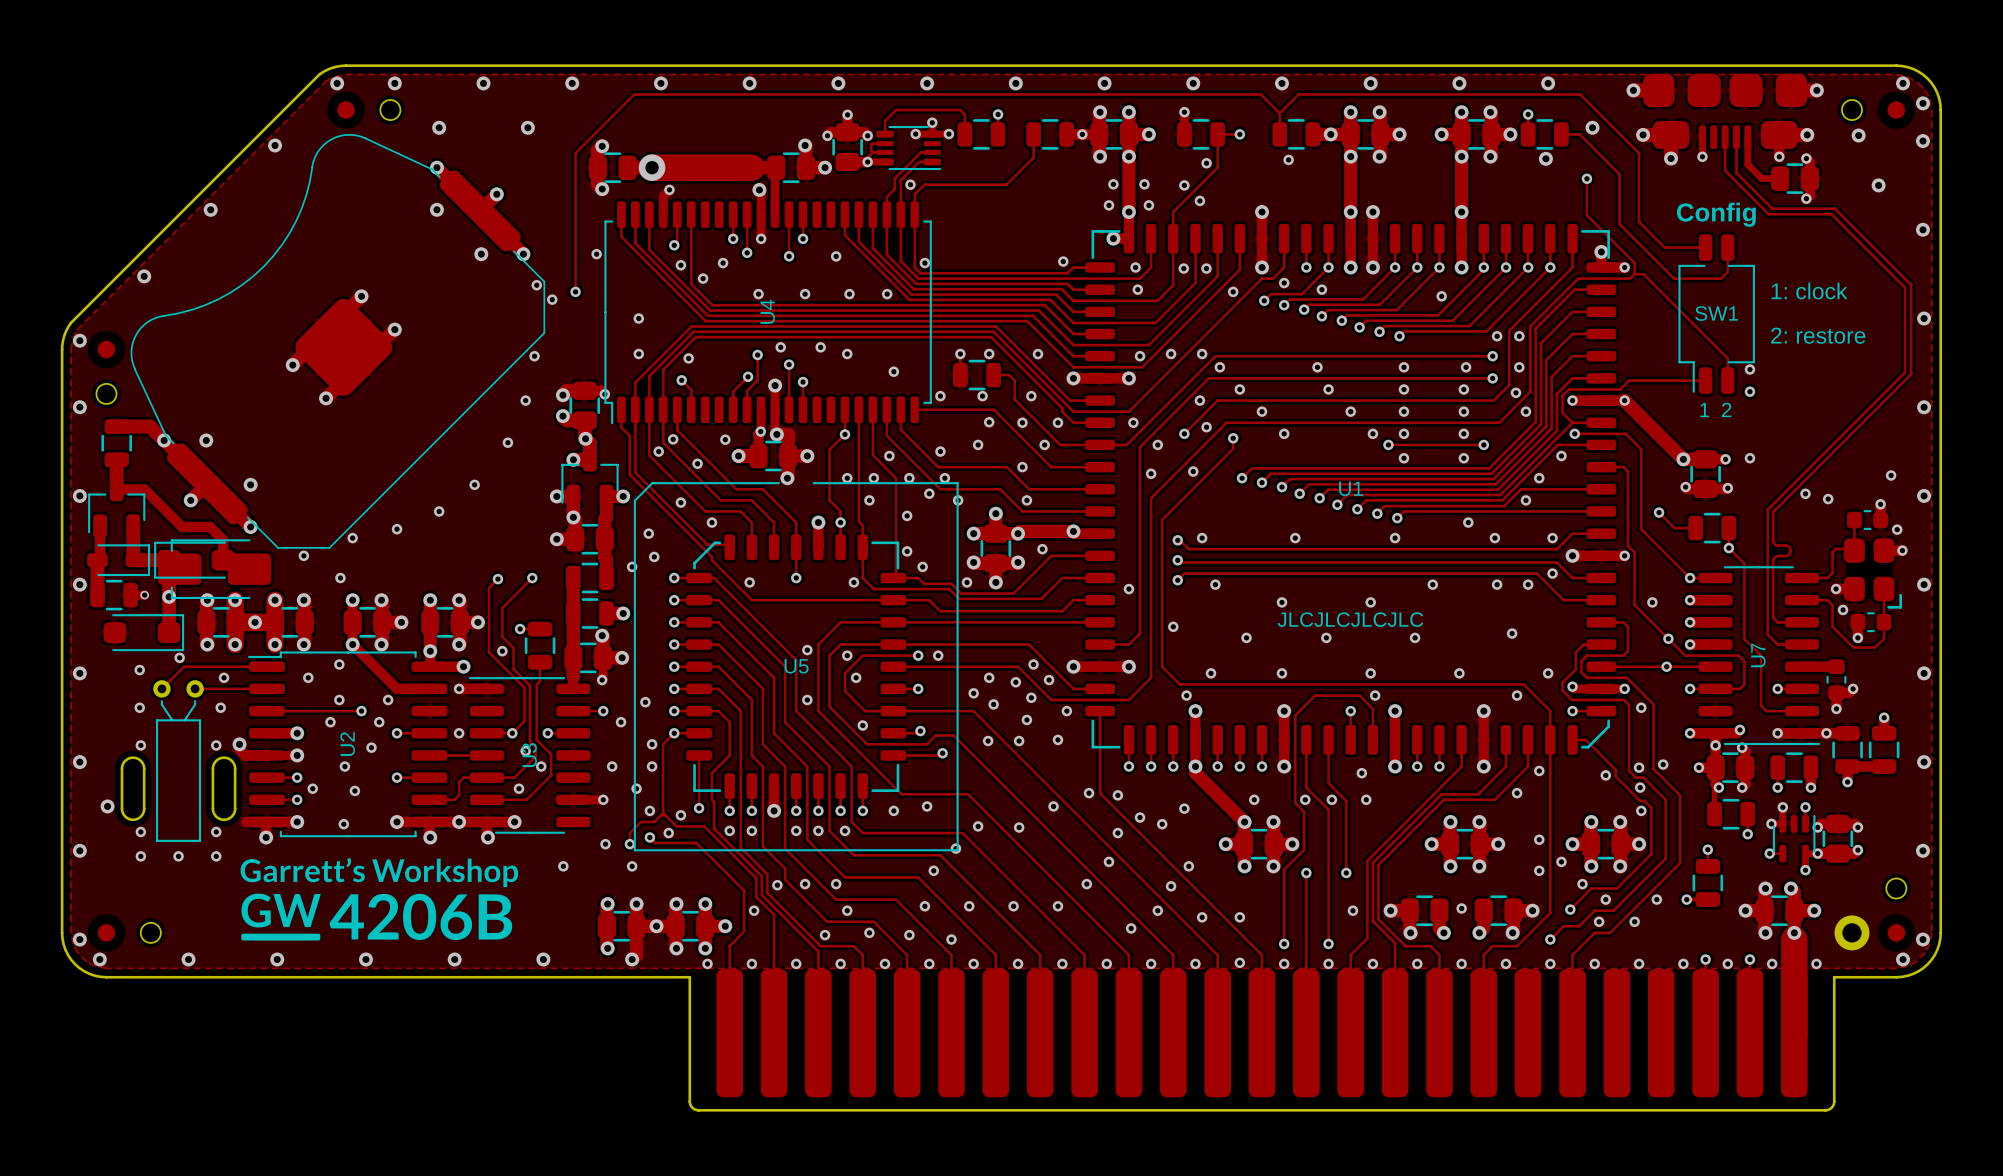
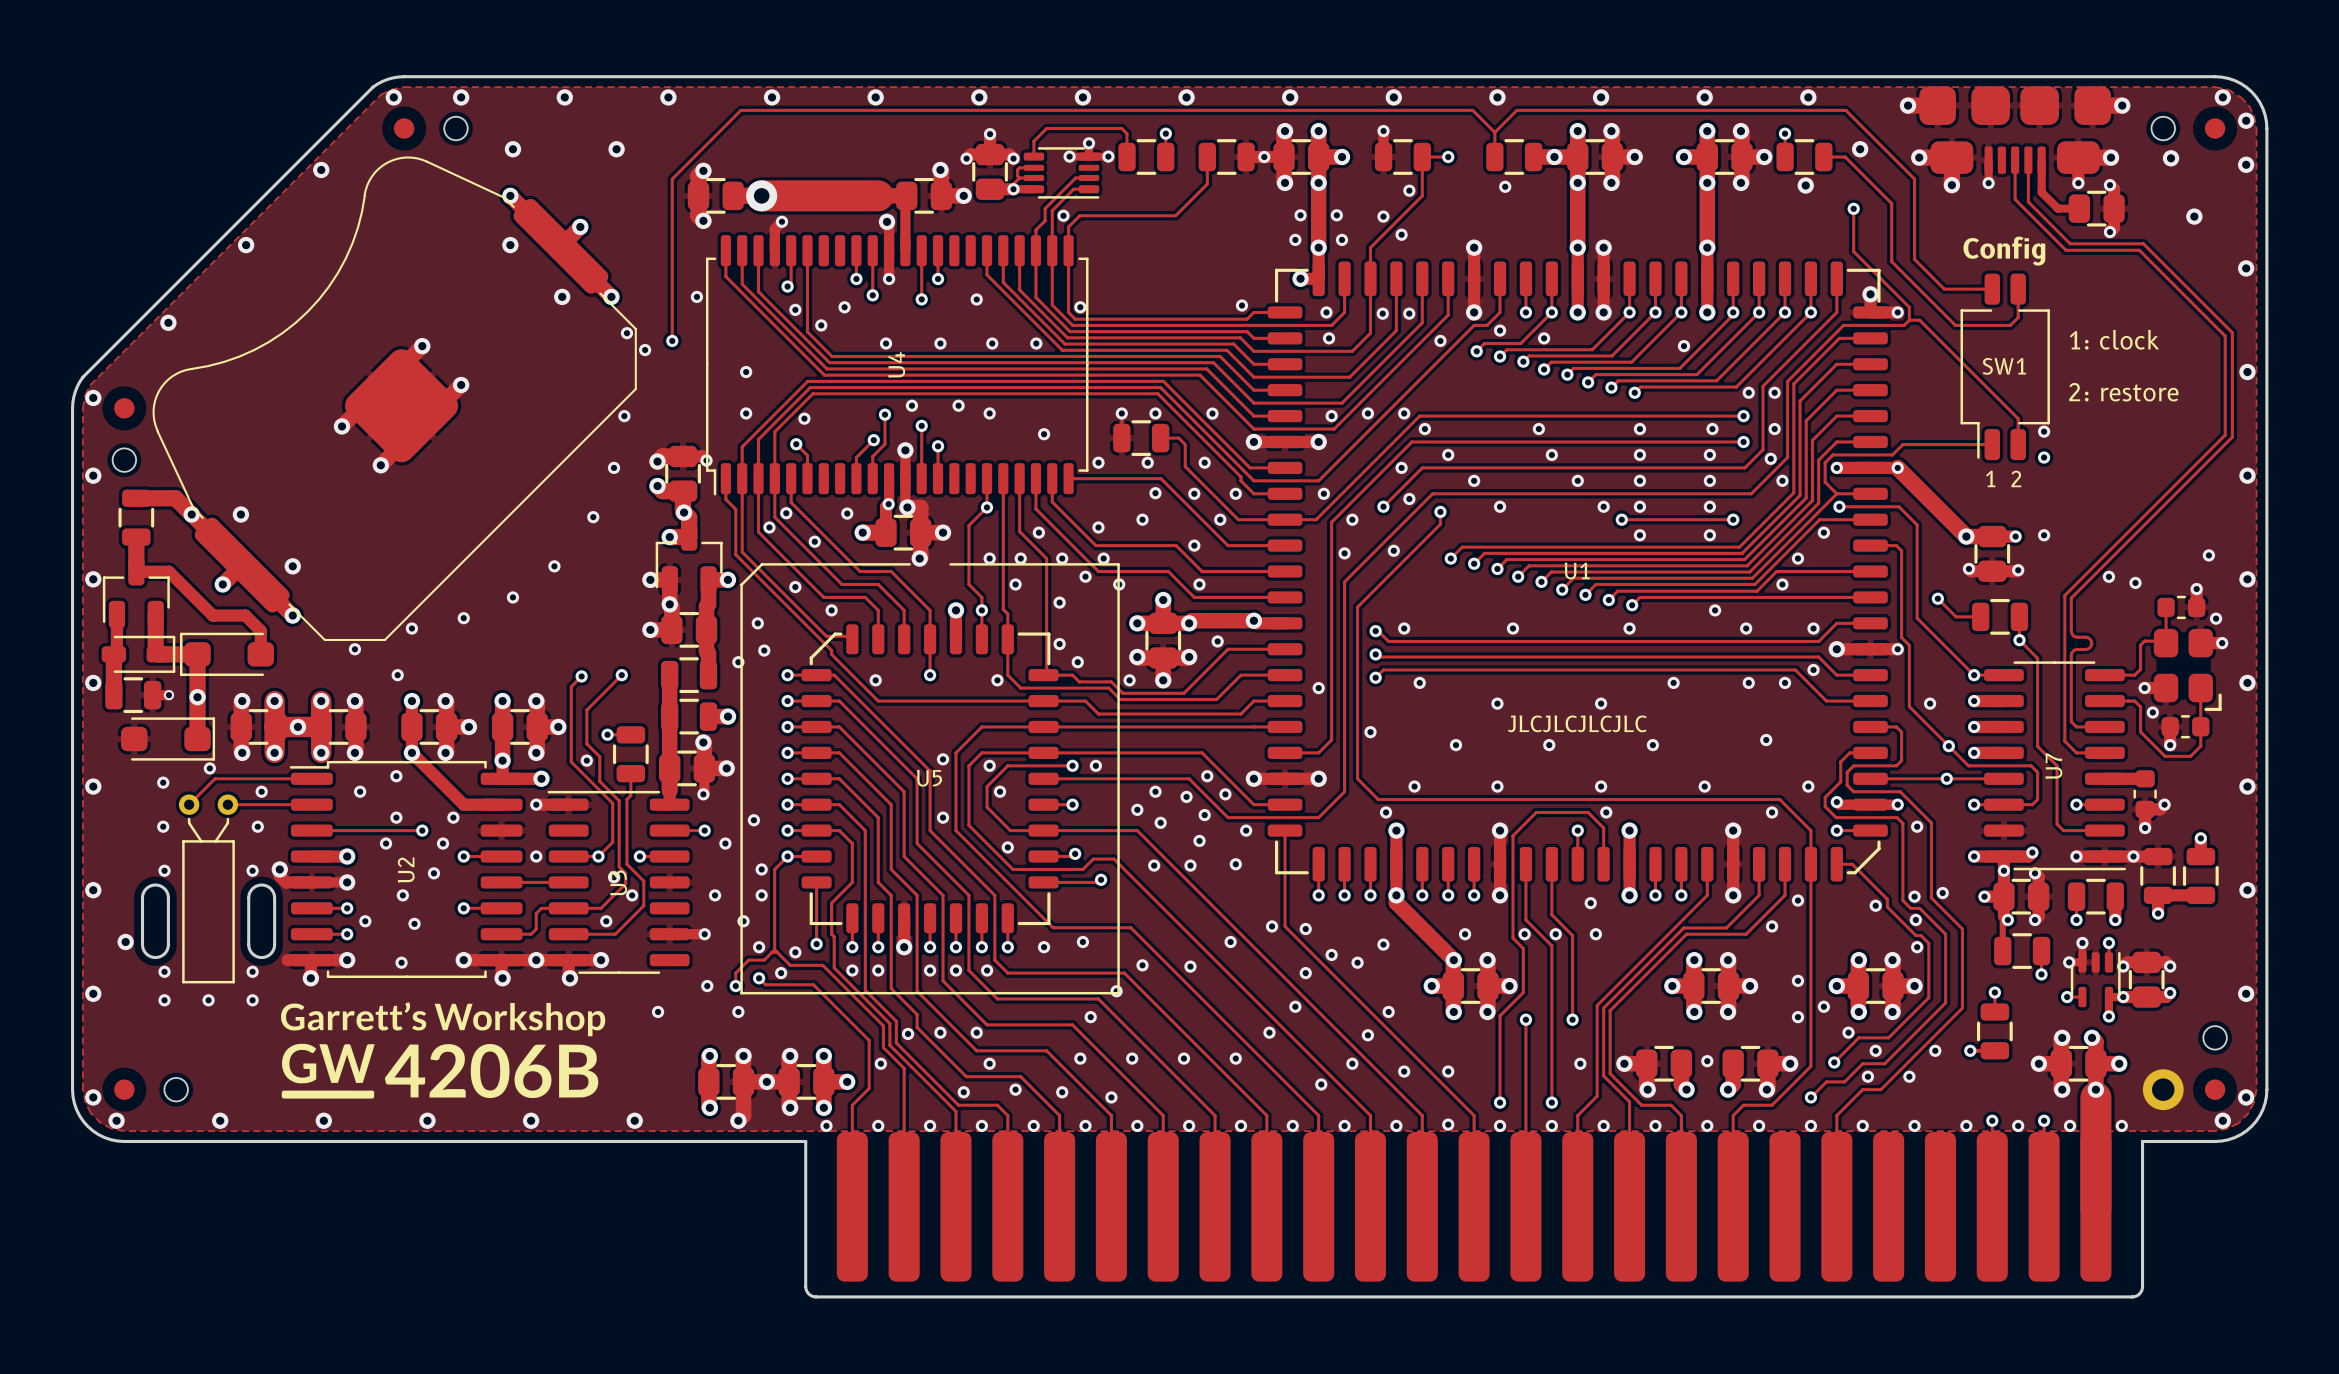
part: (214, 569) -> none

